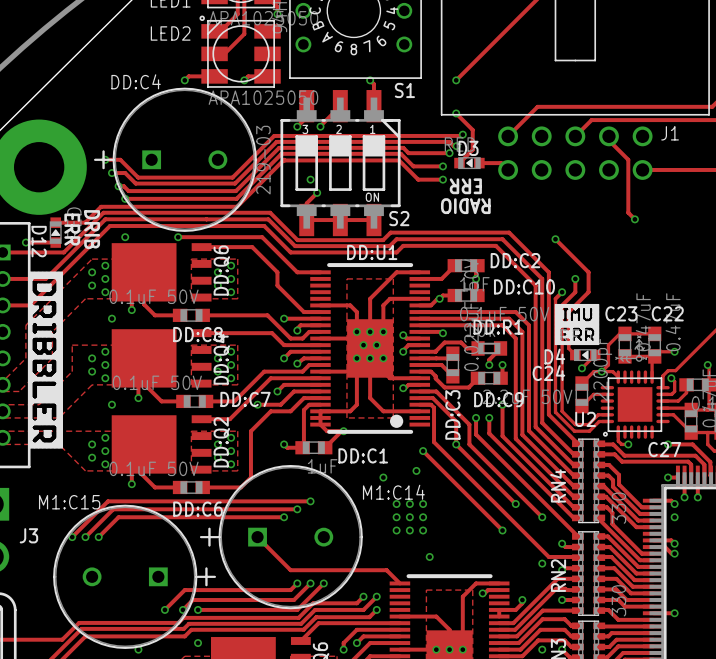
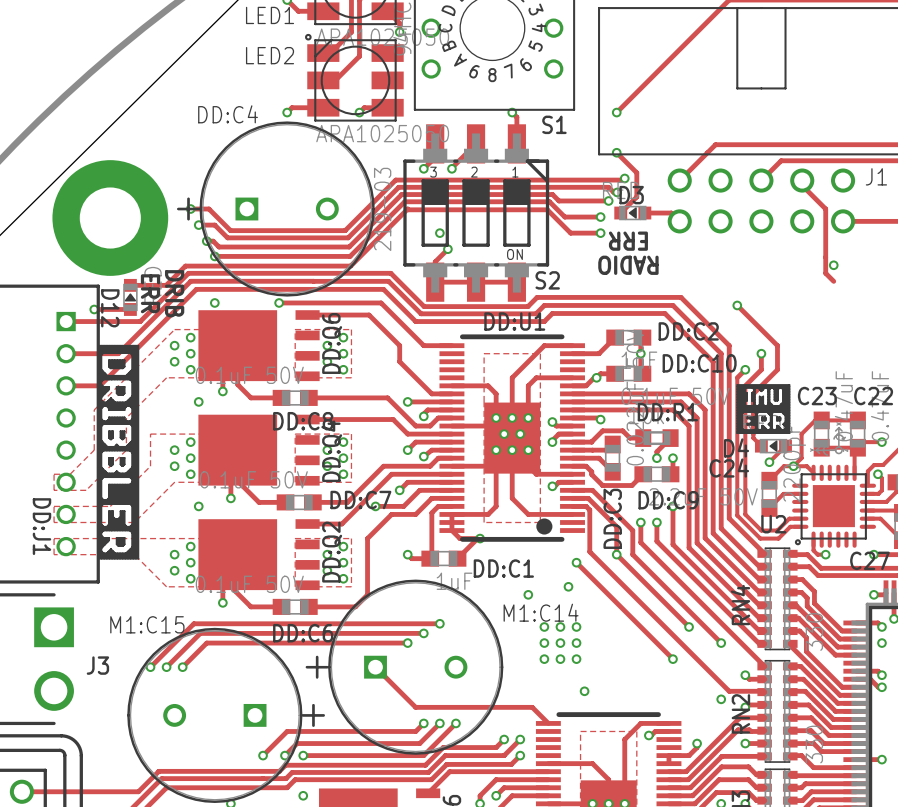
via position: (634, 219) -> (833, 265)

